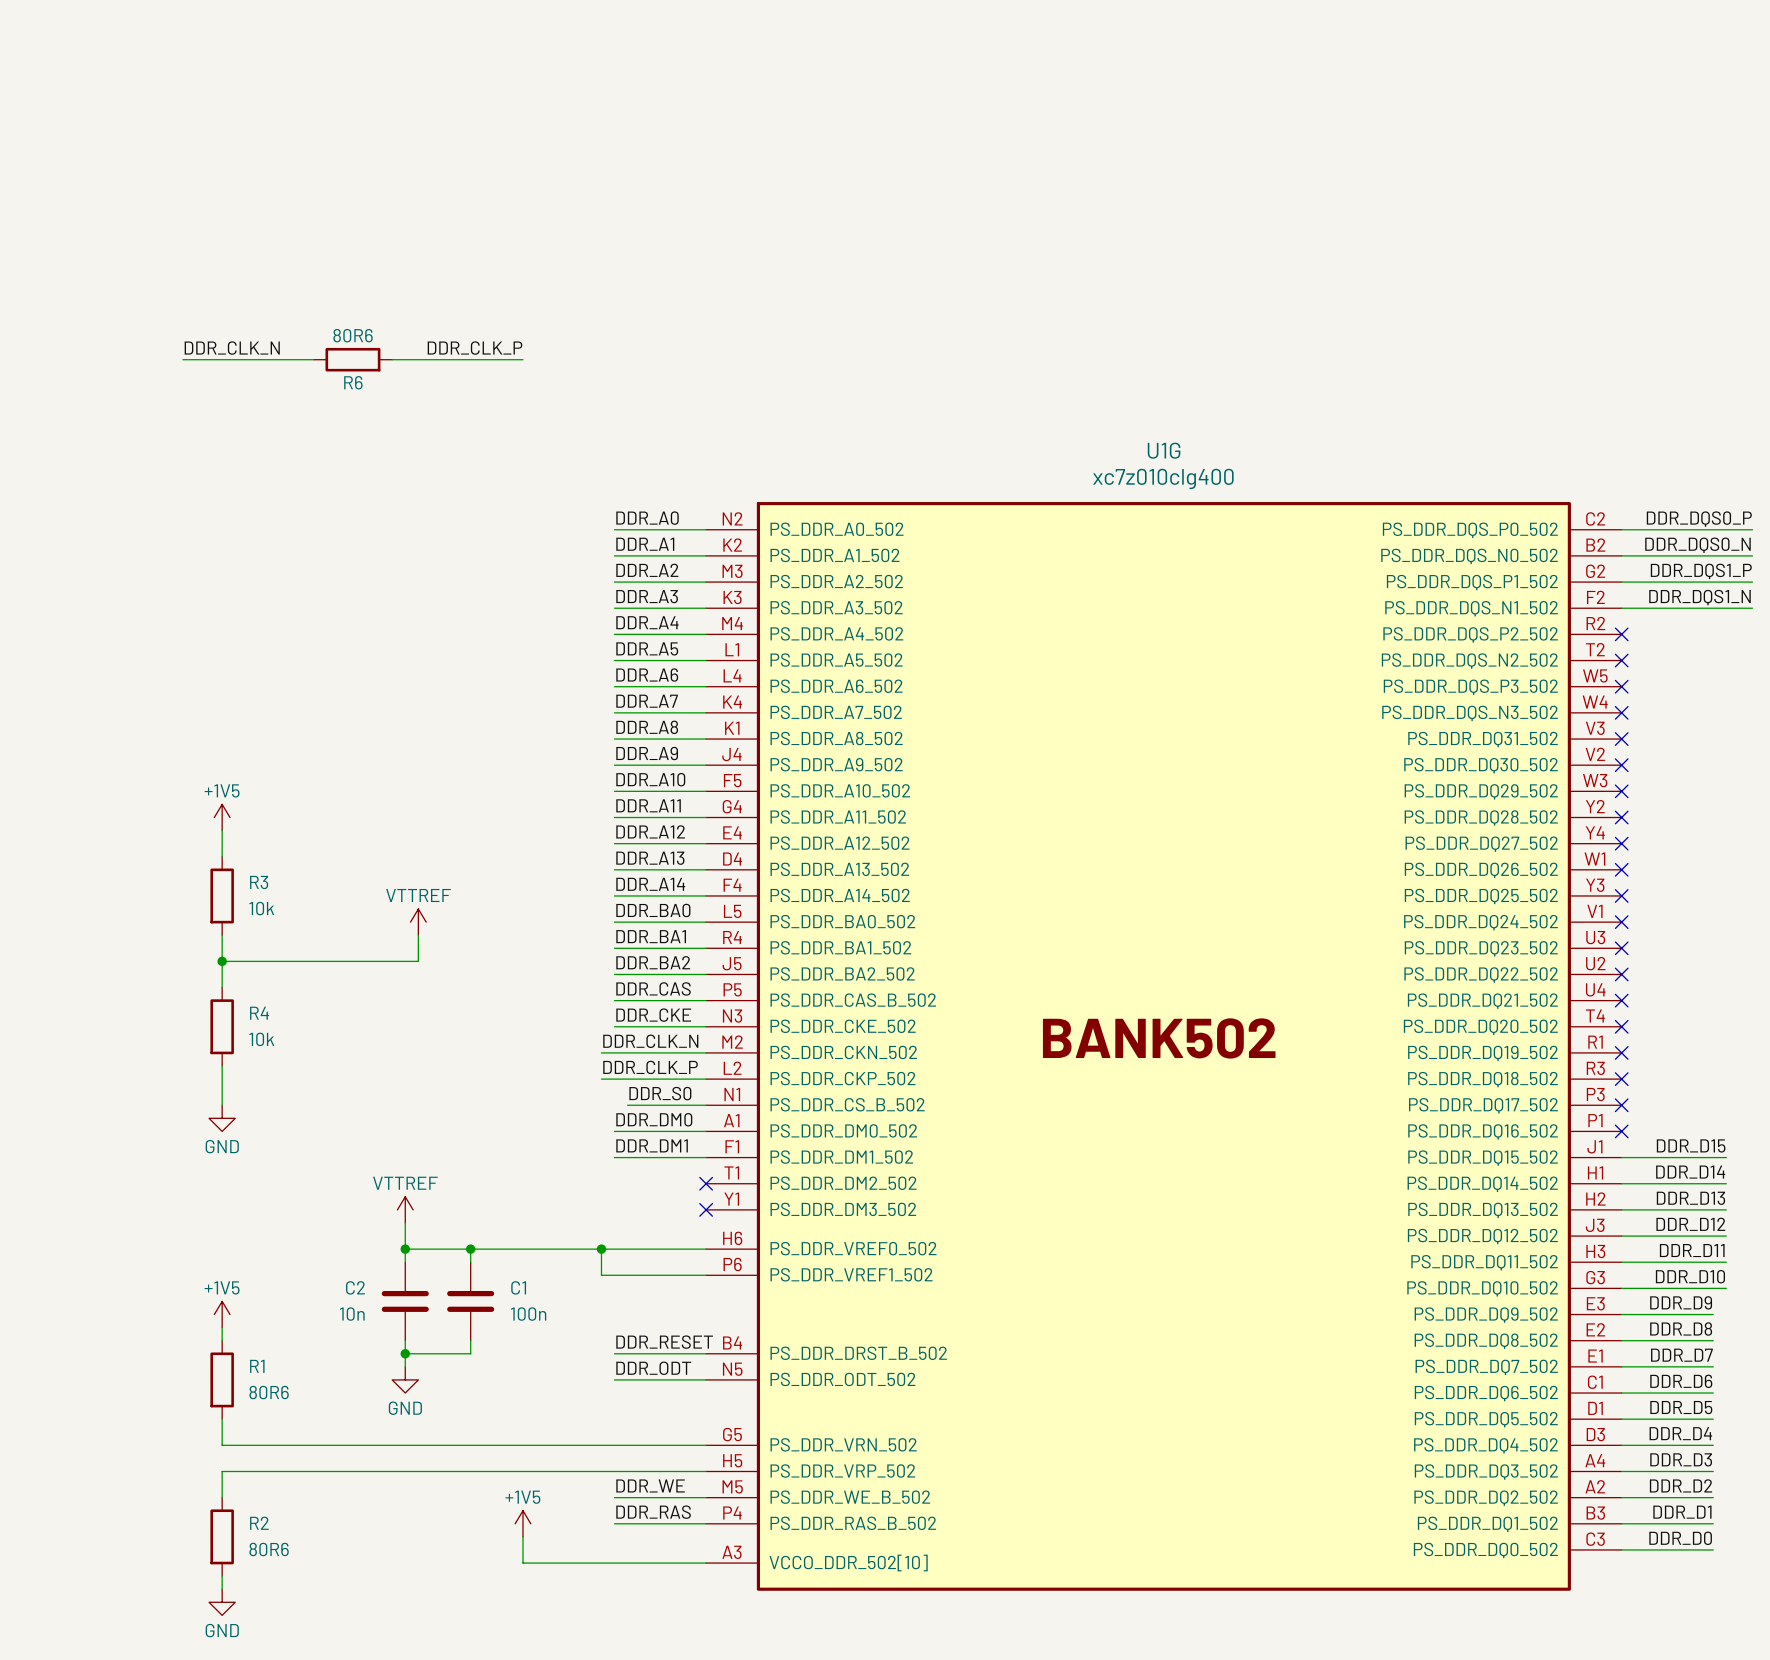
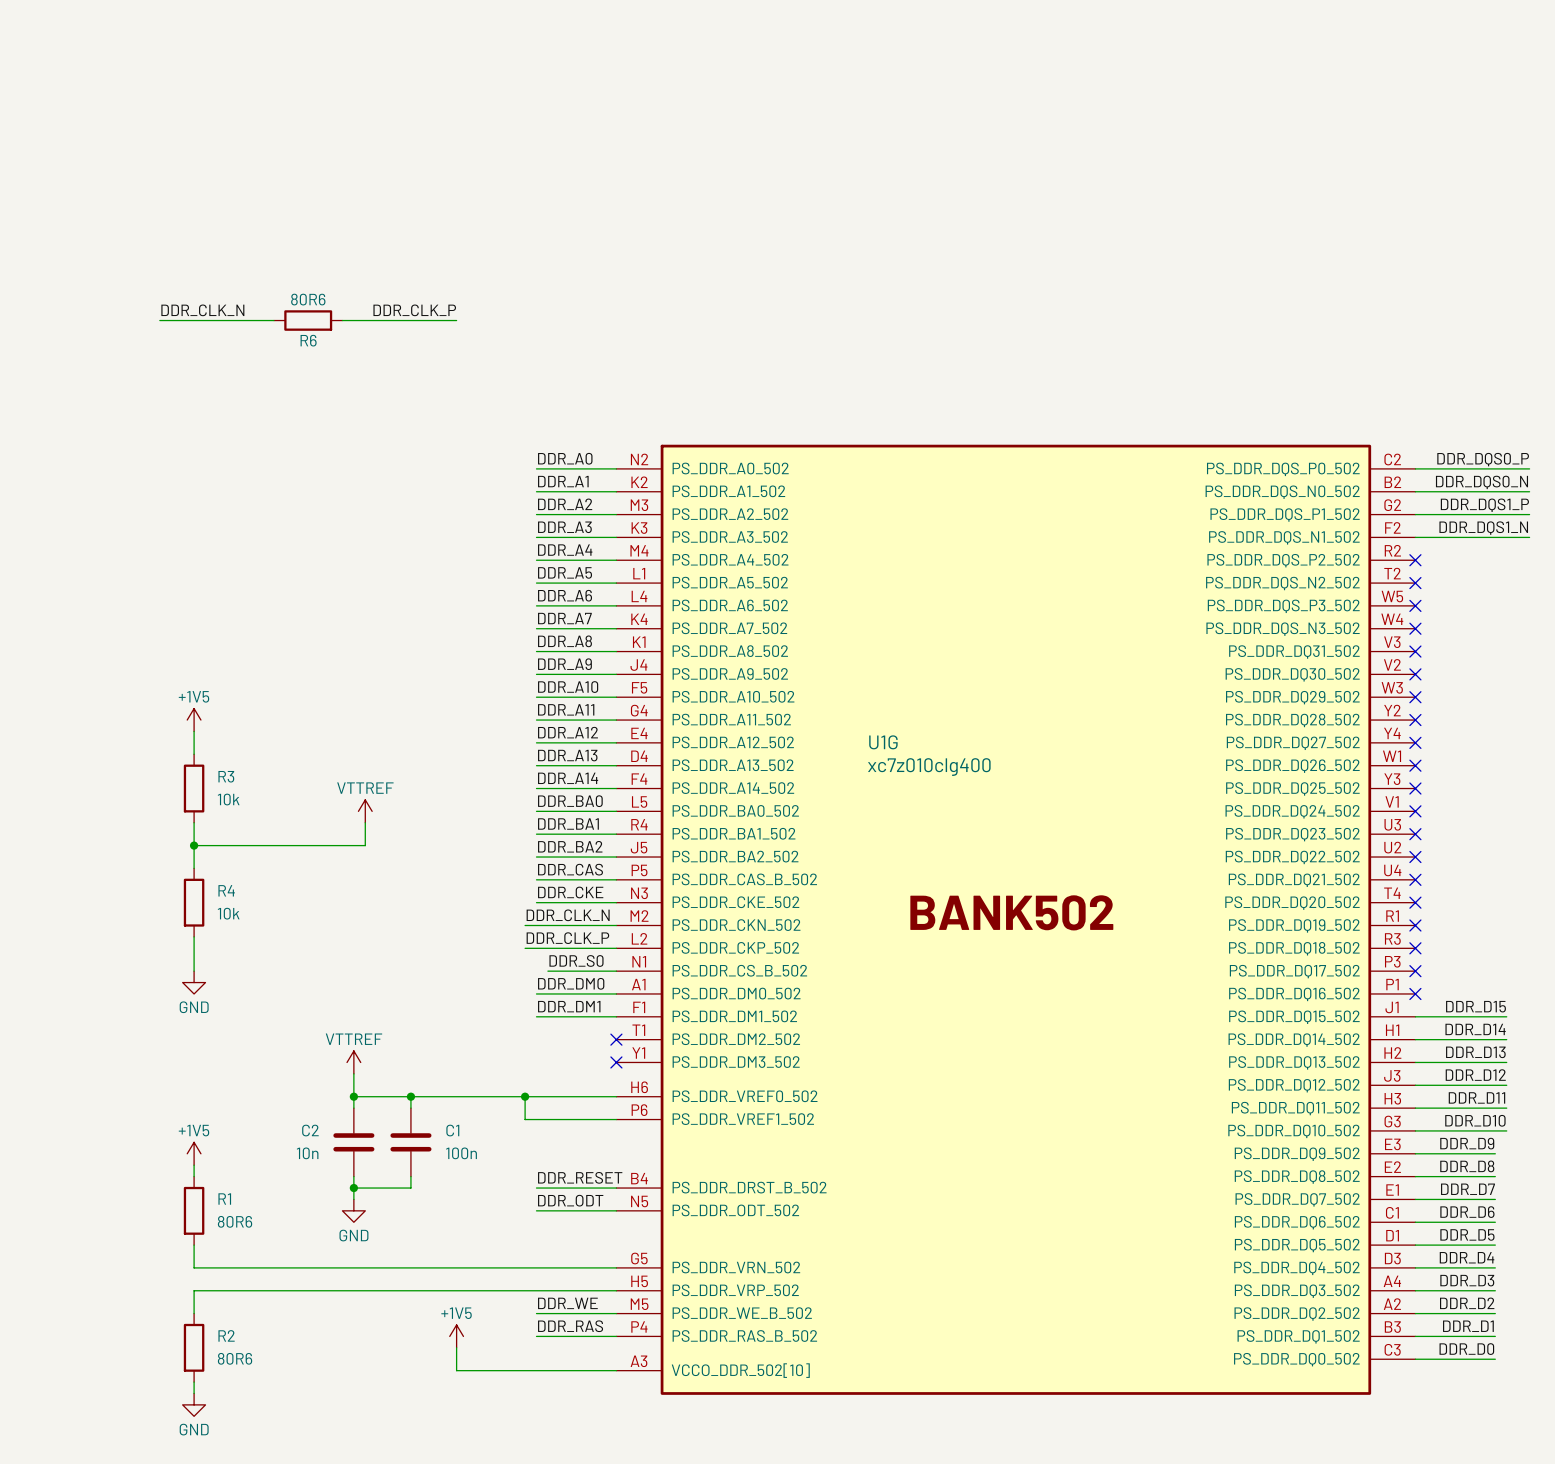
U1G name position: U1G (1164, 450) -> U1G (883, 742)
U1G value position: xc7z010clg400 (1163, 478) -> xc7z010clg400 (929, 767)

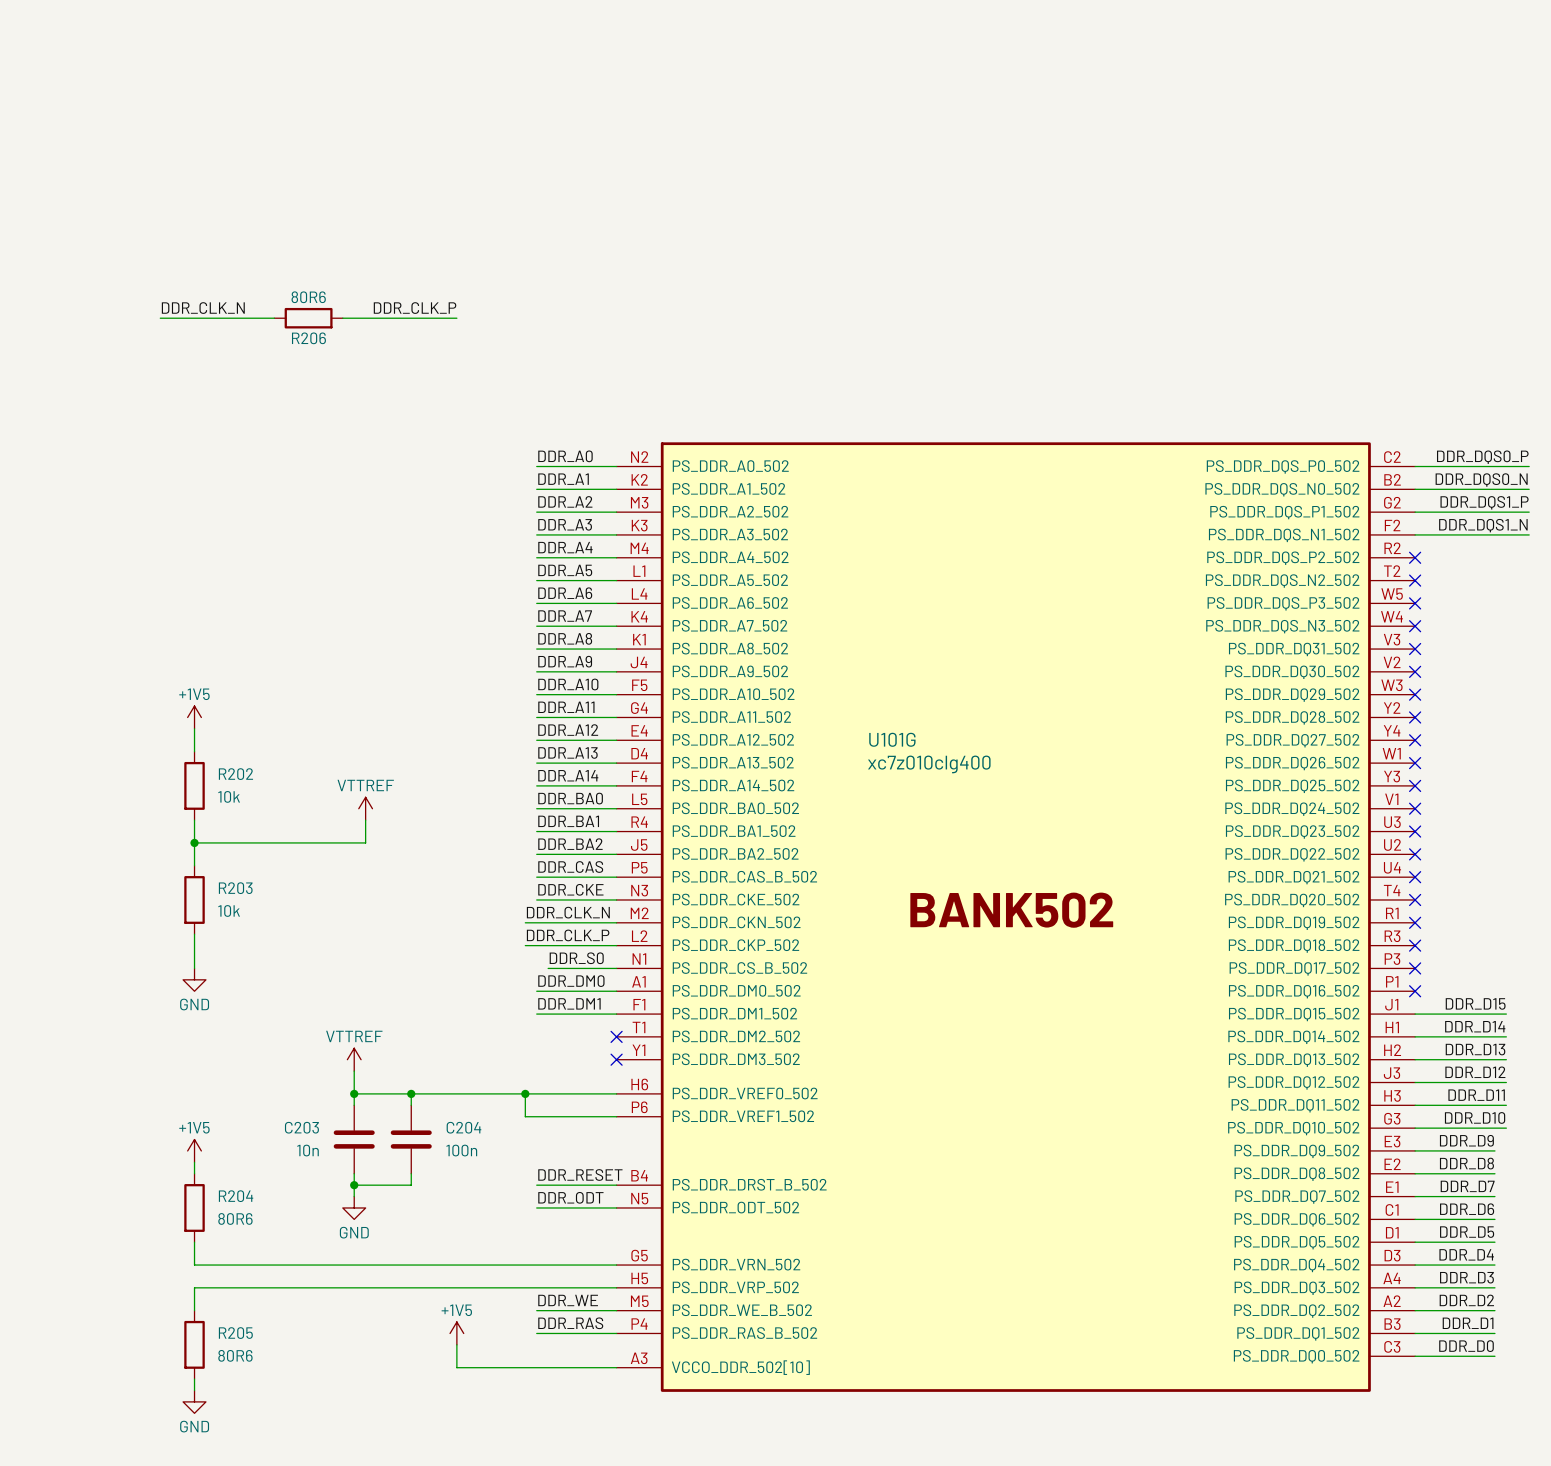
R6 name: R6 (308, 340) -> R206 (308, 338)
U1G name: U1G (883, 742) -> U101G (892, 739)
R3 name: R3 (226, 776) -> R202 (235, 774)
R4 name: R4 (226, 890) -> R203 (235, 888)
C2 name: C2 (310, 1130) -> C203 (301, 1127)
C1 name: C1 (452, 1130) -> C204 (463, 1127)
R1 name: R1 (224, 1199) -> R204 (236, 1196)
R2 name: R2 (226, 1335) -> R205 (235, 1333)

